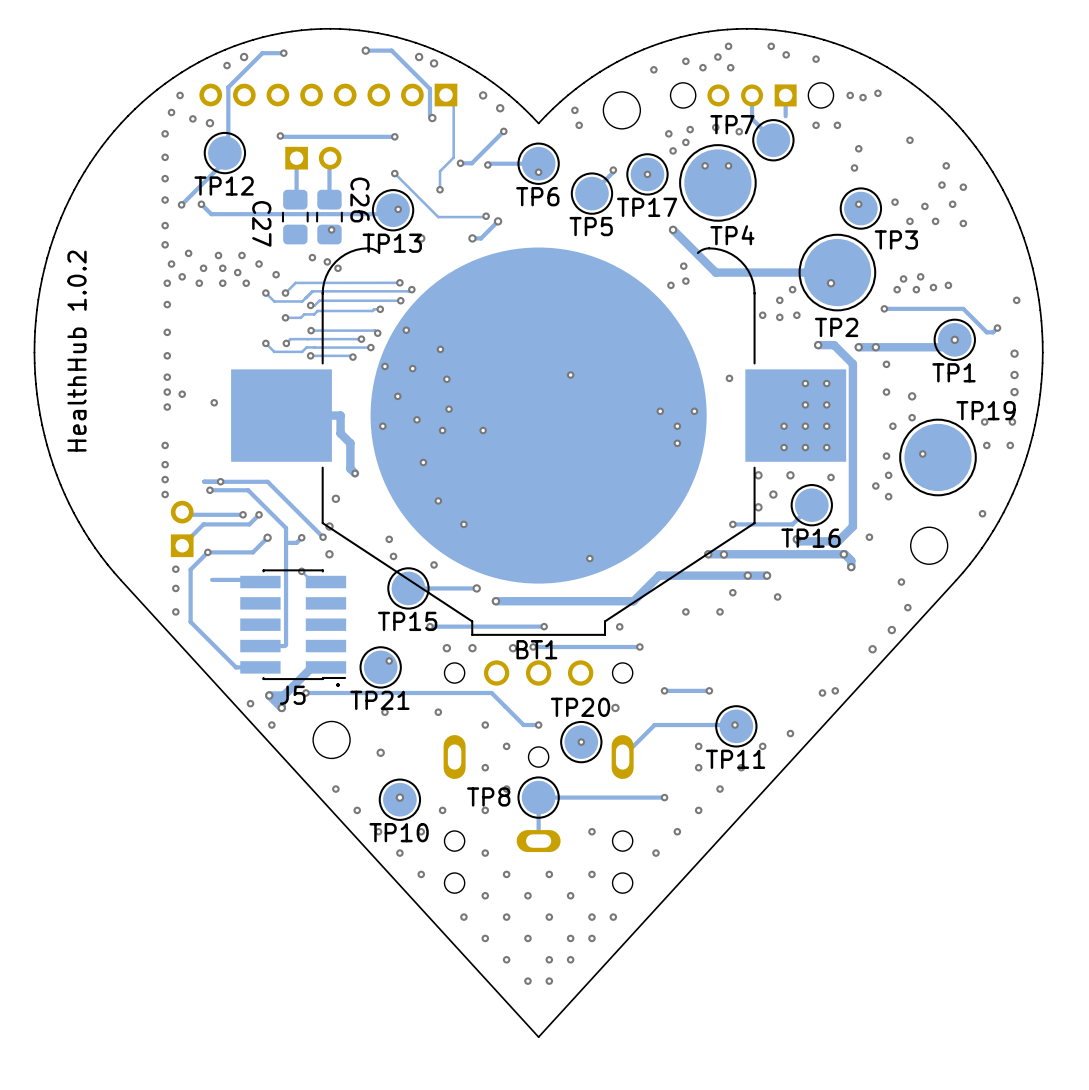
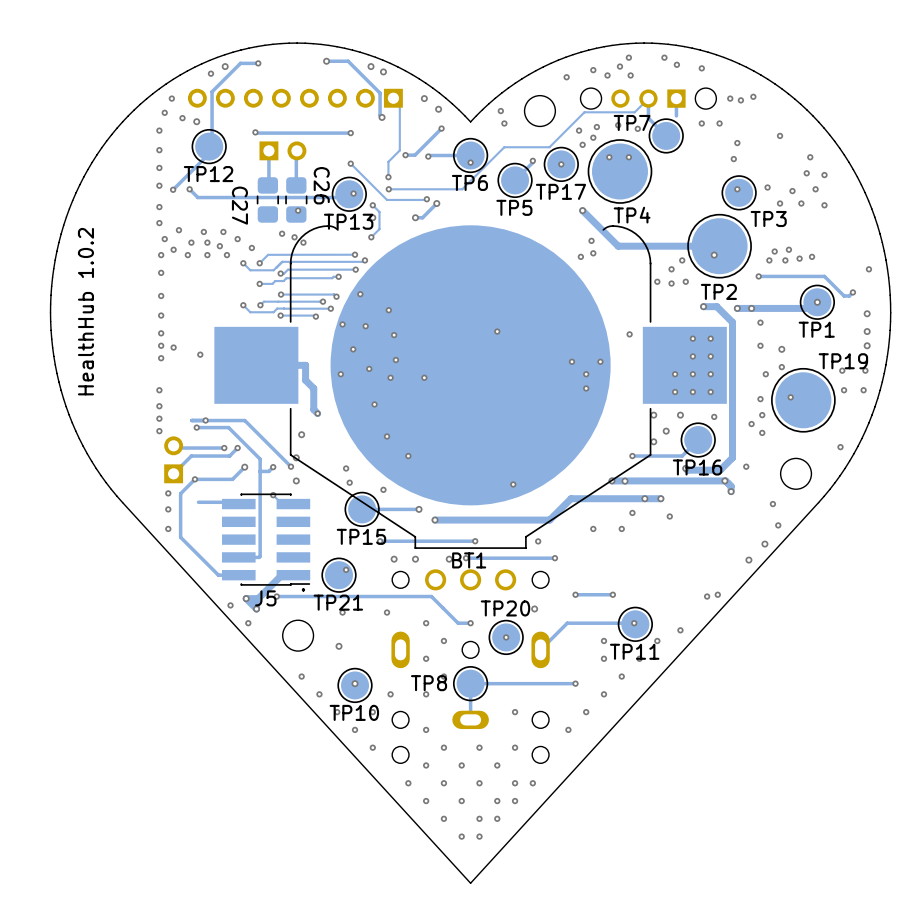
track: none -> (648, 98) (634, 112) (584, 112) (549, 147) (504, 147) (462, 189) (388, 189)
via: none -> (388, 189)
track: none -> (372, 205) (379, 211) (379, 229) (371, 237)
via: none -> (372, 205)
via: none -> (371, 237)

